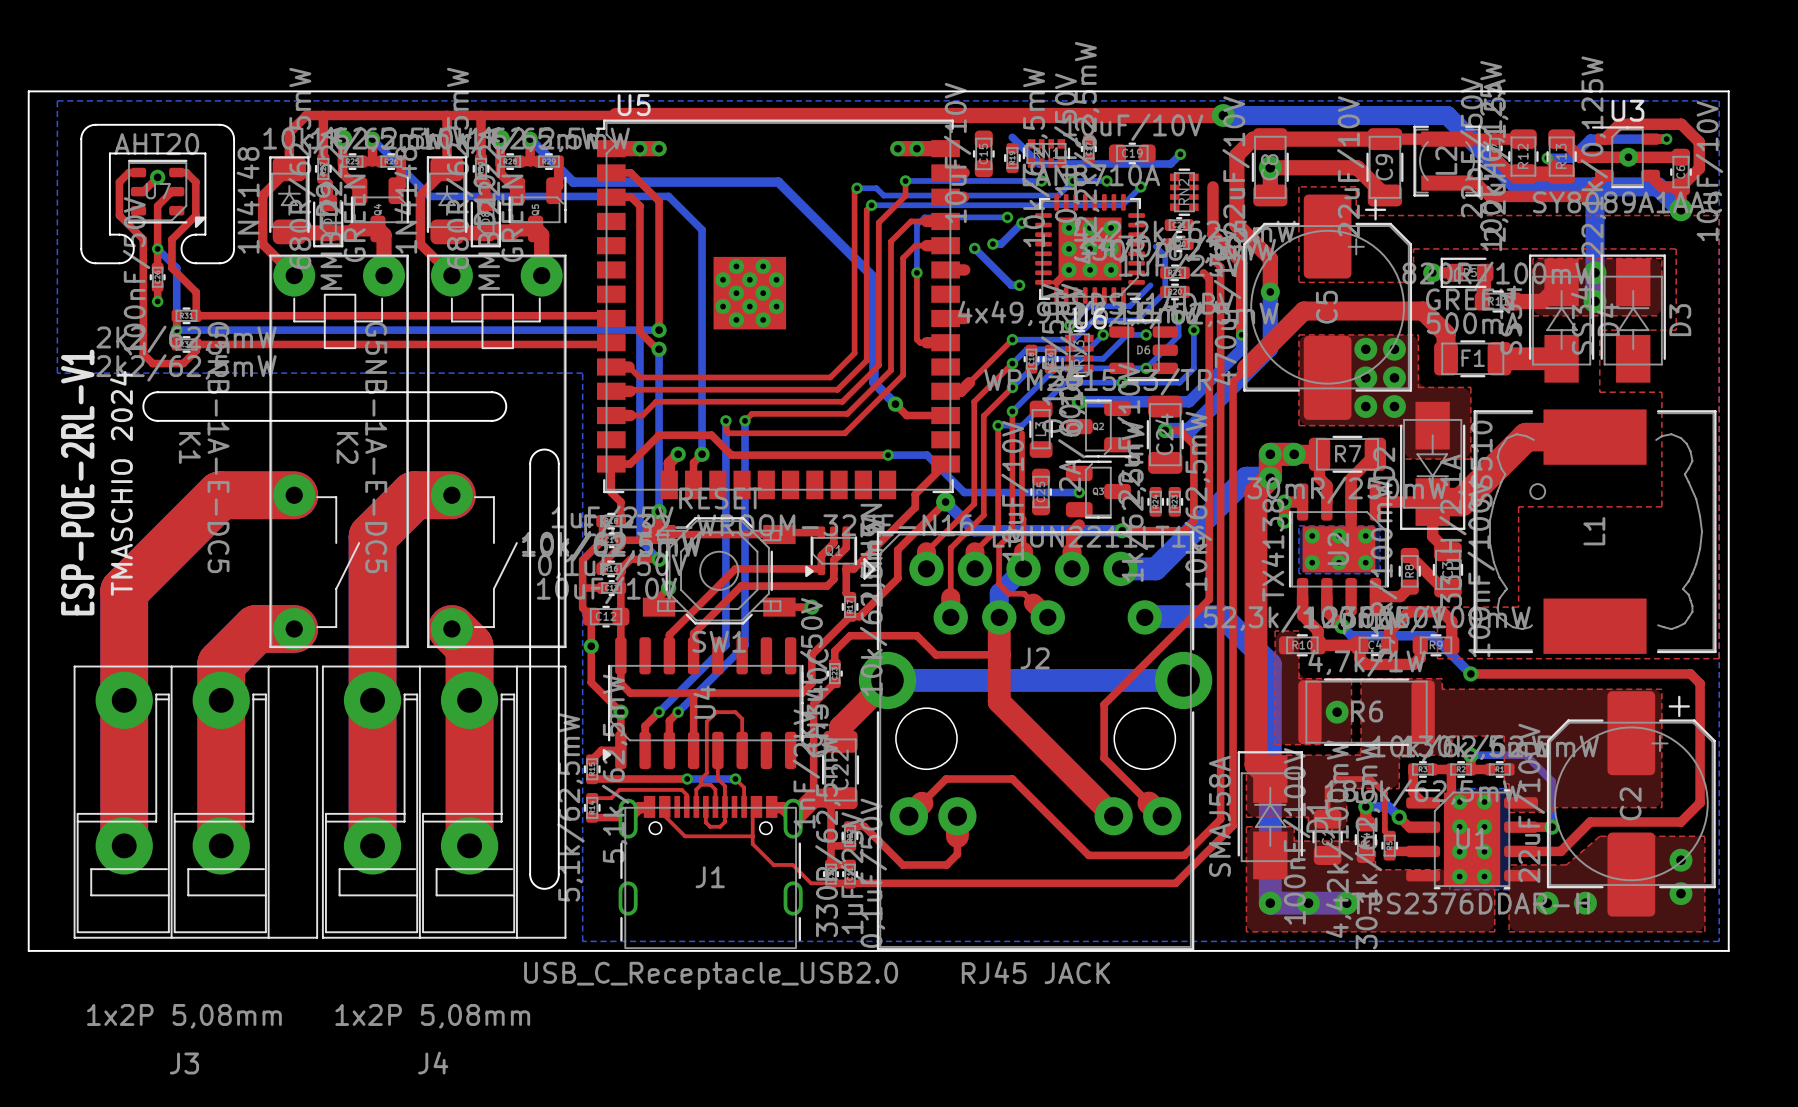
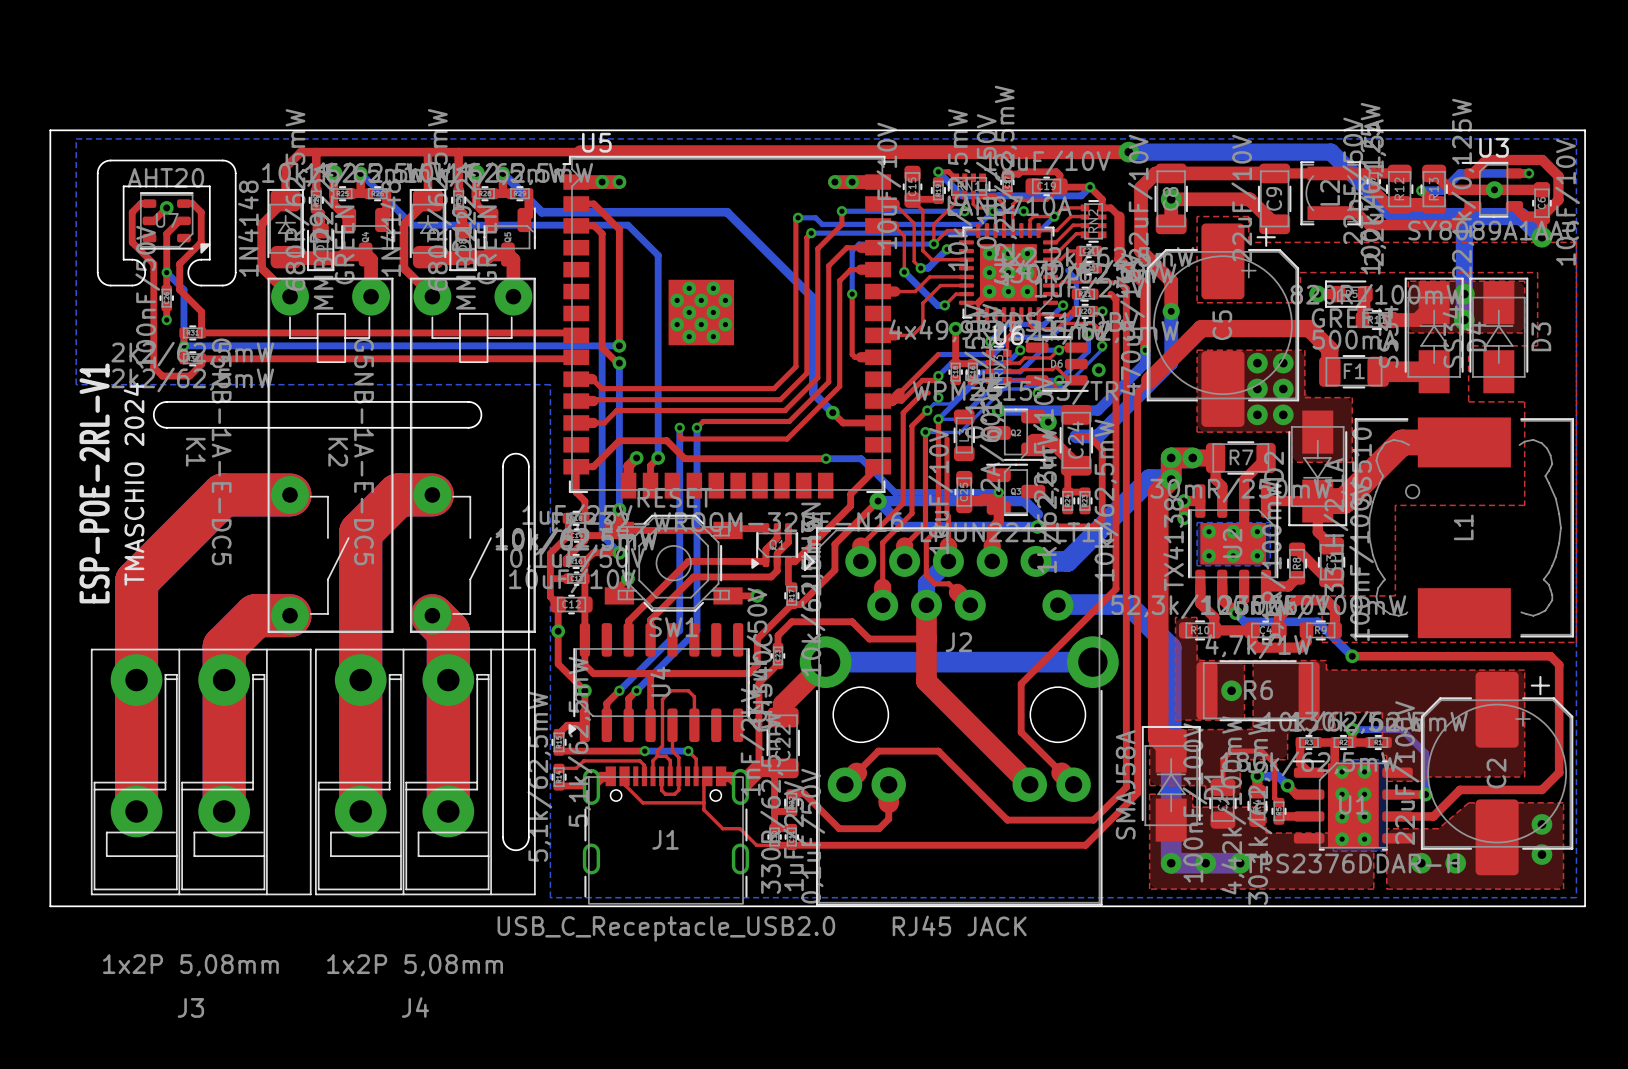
top track: none -> (938, 171) (948, 171) (955, 178) (973, 178)
via: none -> (938, 171)
top track: none -> (1007, 174) (1018, 174) (1020, 171) (1056, 171) (1059, 175) (1059, 187)
top track: none -> (1059, 187) (1046, 200) (1017, 200) (1012, 204) (1012, 230)
top track: none -> (1059, 187) (1090, 187) (1102, 199) (1102, 207) (1110, 207) (1119, 216)
top track: none -> (955, 195) (955, 202) (933, 224) (933, 244) (947, 230) (978, 230)
top track: none -> (973, 195) (973, 204) (977, 208) (989, 208) (993, 211)
top track: none -> (982, 195) (995, 195) (1004, 204) (1004, 230)
top track: none -> (913, 199) (938, 199)
top track: none -> (912, 200) (922, 210) (922, 250) (931, 259) (966, 259)
top track: none -> (894, 203) (914, 223) (914, 261) (920, 268)
top track: none -> (1084, 207) (1062, 207) (1054, 216) (1033, 216) (1030, 220) (1030, 230)
top track: none -> (1084, 216) (1070, 216) (1056, 230) (1038, 230)
top track: none -> (1084, 225) (1073, 225) (1056, 242) (1050, 242)
top track: none -> (894, 225) (904, 235) (904, 272)
top track: none -> (1084, 233) (1076, 233) (1059, 251) (1050, 251)
top track: none -> (1050, 259) (1060, 259) (1069, 251) (1078, 251) (1078, 268)
top track: none -> (966, 276) (929, 276) (915, 291) (895, 291)
top track: none -> (1119, 282) (1062, 282) (1059, 285) (1050, 285)
top track: none -> (966, 285) (940, 285) (922, 303) (922, 325) (912, 335) (895, 335)
top track: none -> (966, 294) (956, 294) (944, 305)
via: none -> (1063, 305)
top track: none -> (1076, 311) (1071, 311) (1067, 315) (1038, 314)
via: none -> (1102, 311)
top track: none -> (1012, 314) (1012, 331) (1007, 337) (1007, 353)
top track: none -> (1030, 314) (1030, 325) (1033, 328) (1057, 328) (1062, 323) (1093, 323) (1102, 332) (1102, 344)
top track: none -> (955, 328) (955, 363) (972, 363)
via: none -> (955, 328)
top track: none -> (1076, 347) (1060, 347) (1050, 357) (1024, 357) (1019, 363) (1007, 363)
bottom track: (1193, 334) (1193, 368) (1179, 382) (1064, 382) -> (1102, 349) (1065, 386) (1025, 386) (1023, 388) (1003, 388) (960, 432) (925, 432)
via position: (1012, 339) -> (927, 410)
bottom track: (1061, 358) (1041, 358) (1012, 387) -> (982, 371) (950, 403) (933, 403) (927, 410)
top track: none -> (1007, 371) (1052, 369) (1055, 366) (1069, 380)
top track: (1012, 363) (974, 401) (973, 504) -> (928, 393) (922, 393) (903, 412) (903, 503)
top track: none -> (938, 380) (922, 380) (901, 401) (896, 401)
top track: none -> (1007, 380) (1049, 380) (1055, 386)
top track: (1012, 387) (983, 416) (983, 515) -> (927, 410) (911, 425) (911, 513)
bottom track: (1036, 411) (1021, 425) (998, 425) -> (959, 419) (942, 419)
via: none -> (1048, 422)
via position: (1165, 430) -> (1098, 370)
top track: none -> (1033, 440) (1051, 440) (1076, 465) (1067, 474) (1067, 492) (1084, 492)
bottom track: none -> (879, 498) (882, 501) (1024, 501) (1038, 514)
top track: none -> (964, 501) (998, 499) (998, 521)

